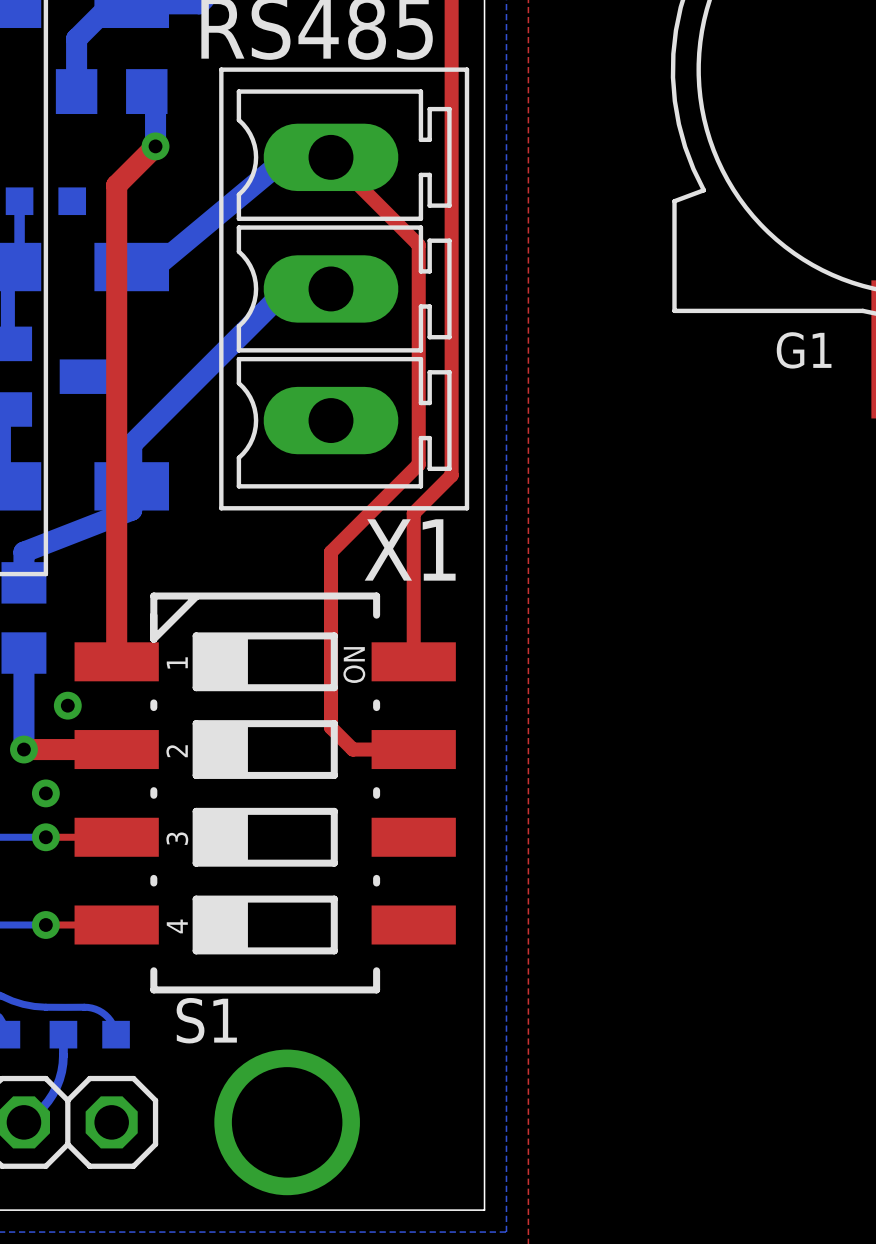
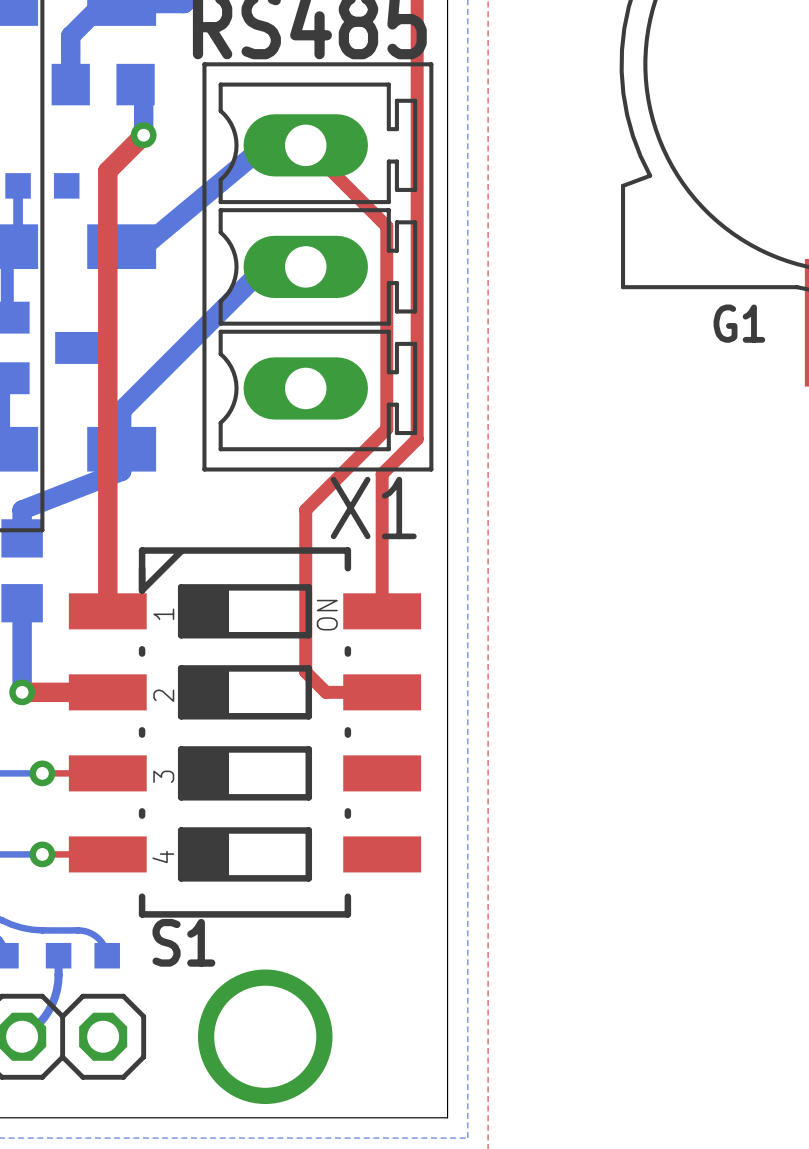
via: (67, 705) -> none
via: (45, 793) -> none

